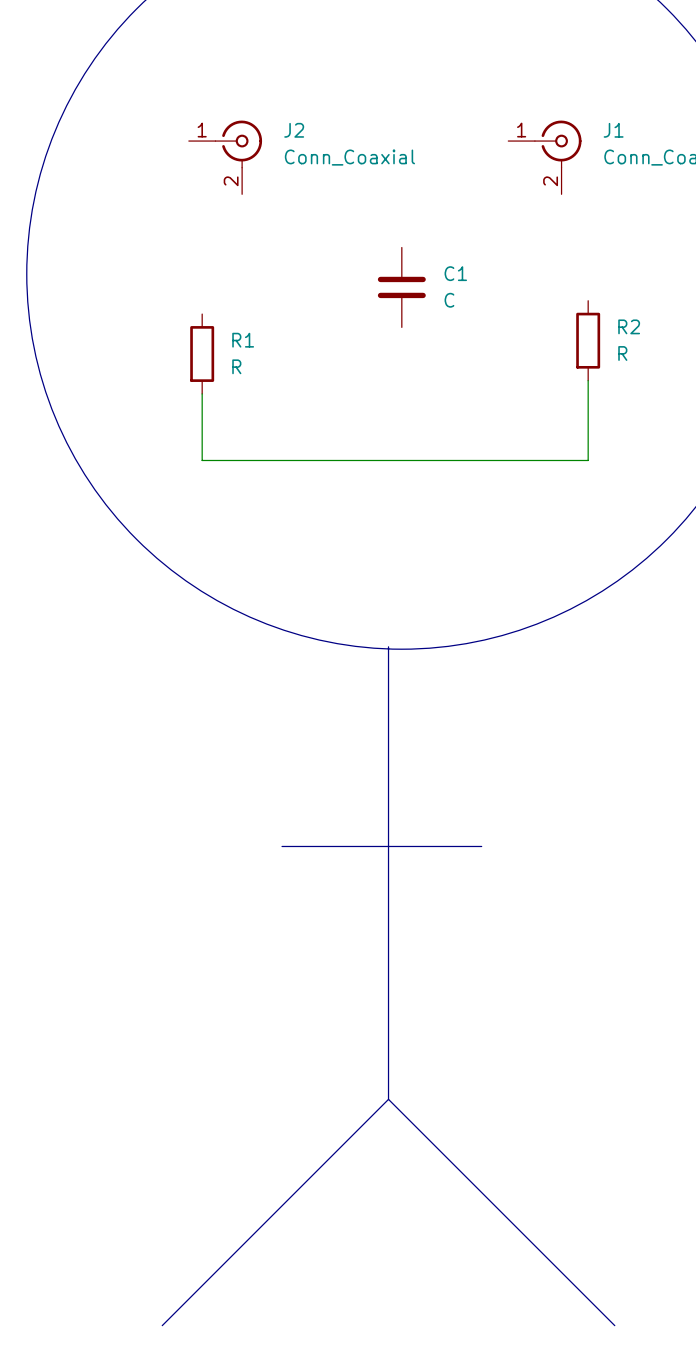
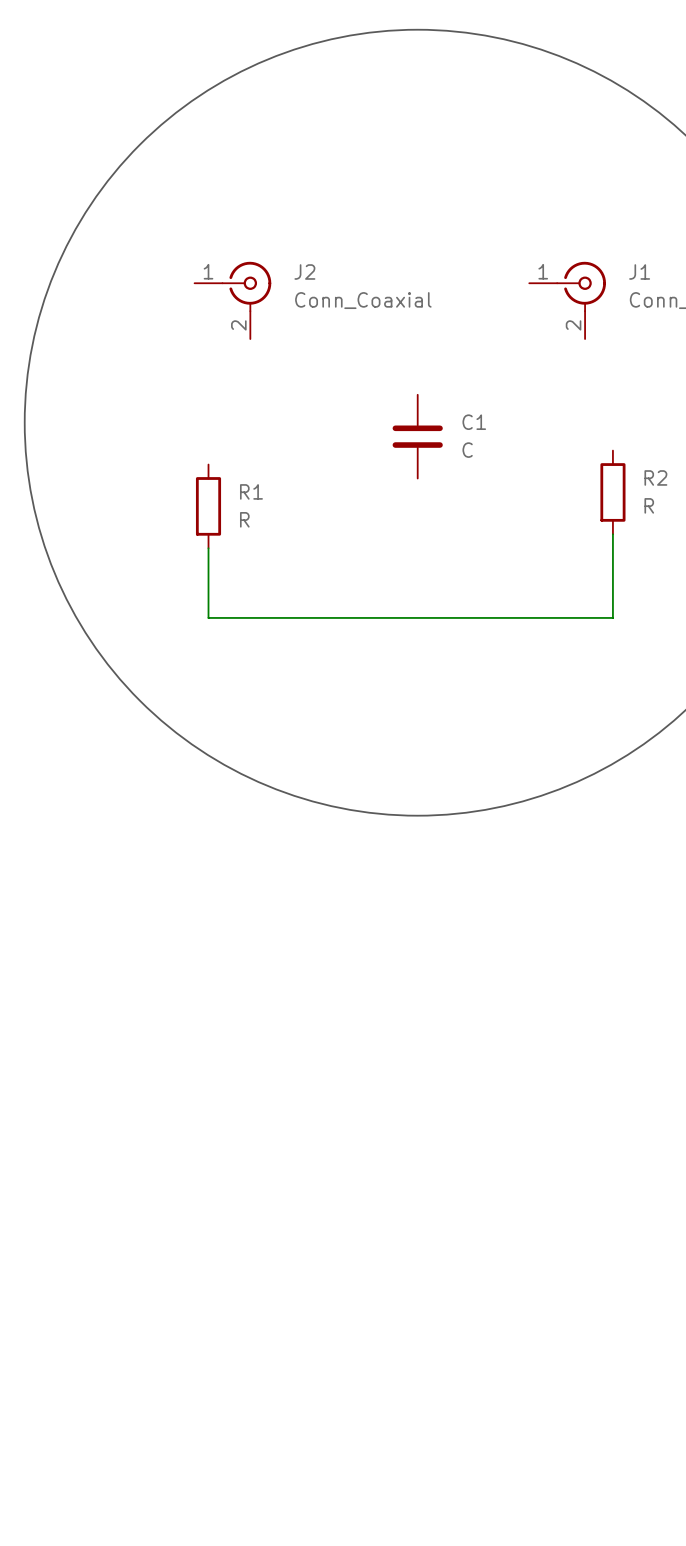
line: (388, 646) (388, 1099) -> none
line: (282, 846) (481, 846) -> none
line: (388, 1099) (162, 1325) -> none
line: (388, 1099) (614, 1325) -> none

